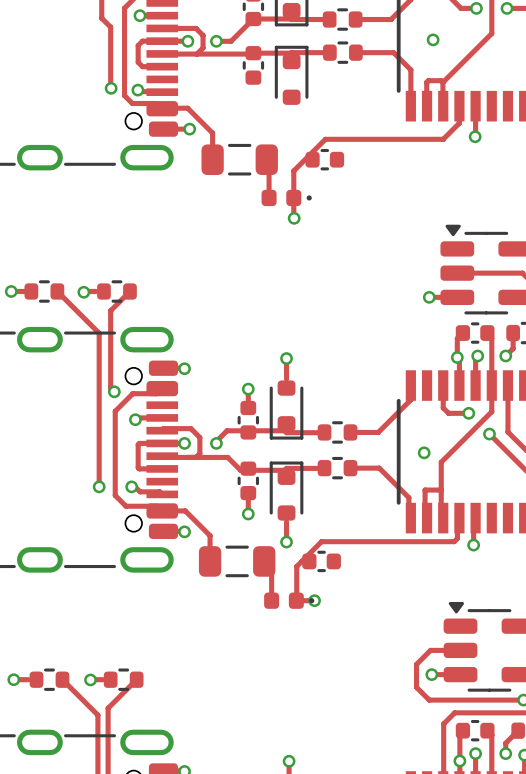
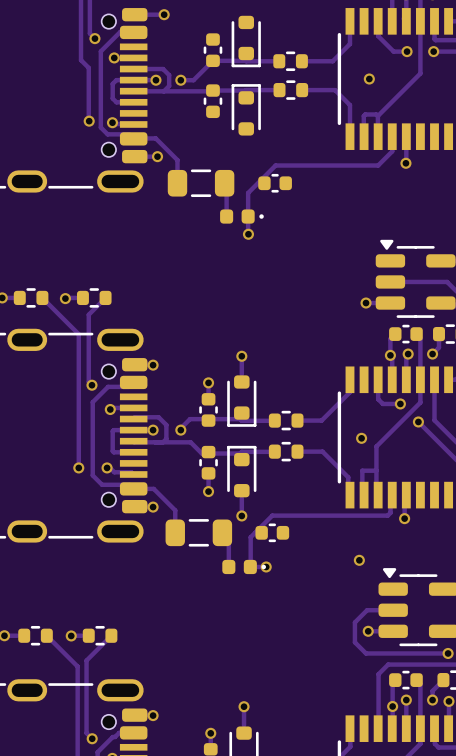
via: none -> (359, 560)

